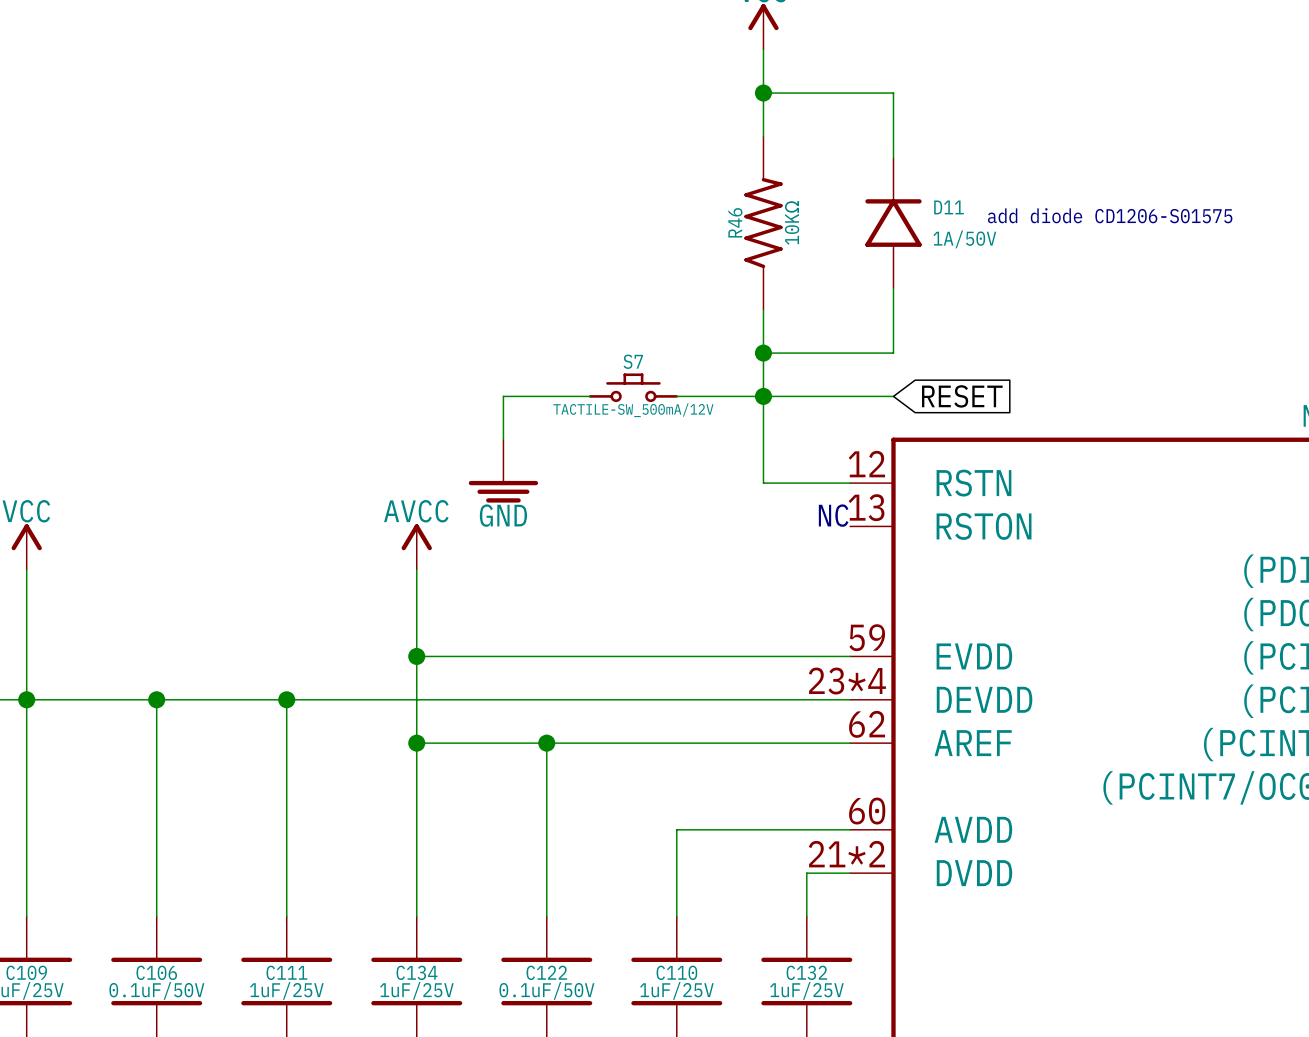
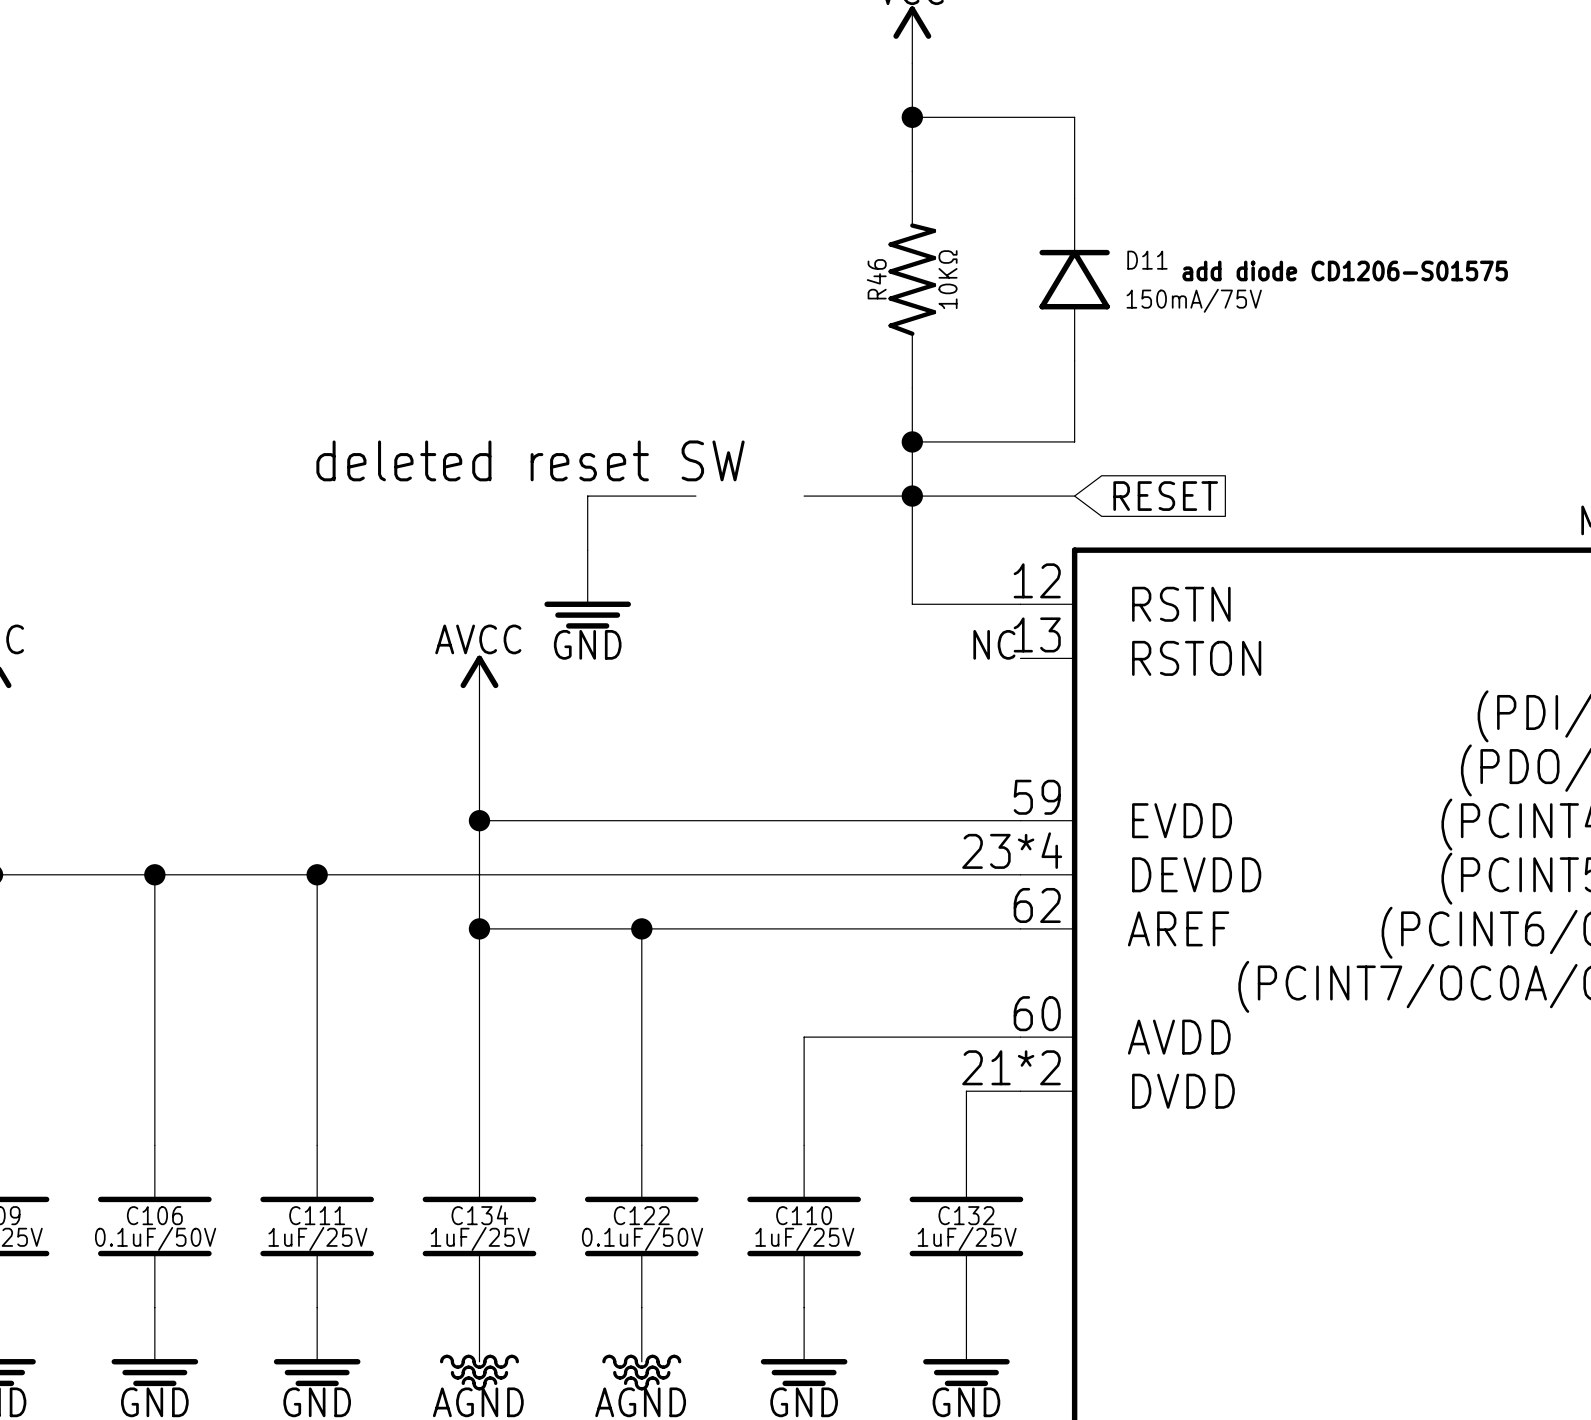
D11 value: 1A/50V (964, 239) -> 150mA/75V (1194, 300)
text: none -> deleted reset SW (530, 460)
S7: TACTILE-SW_500mA/12V (633, 387) -> none

